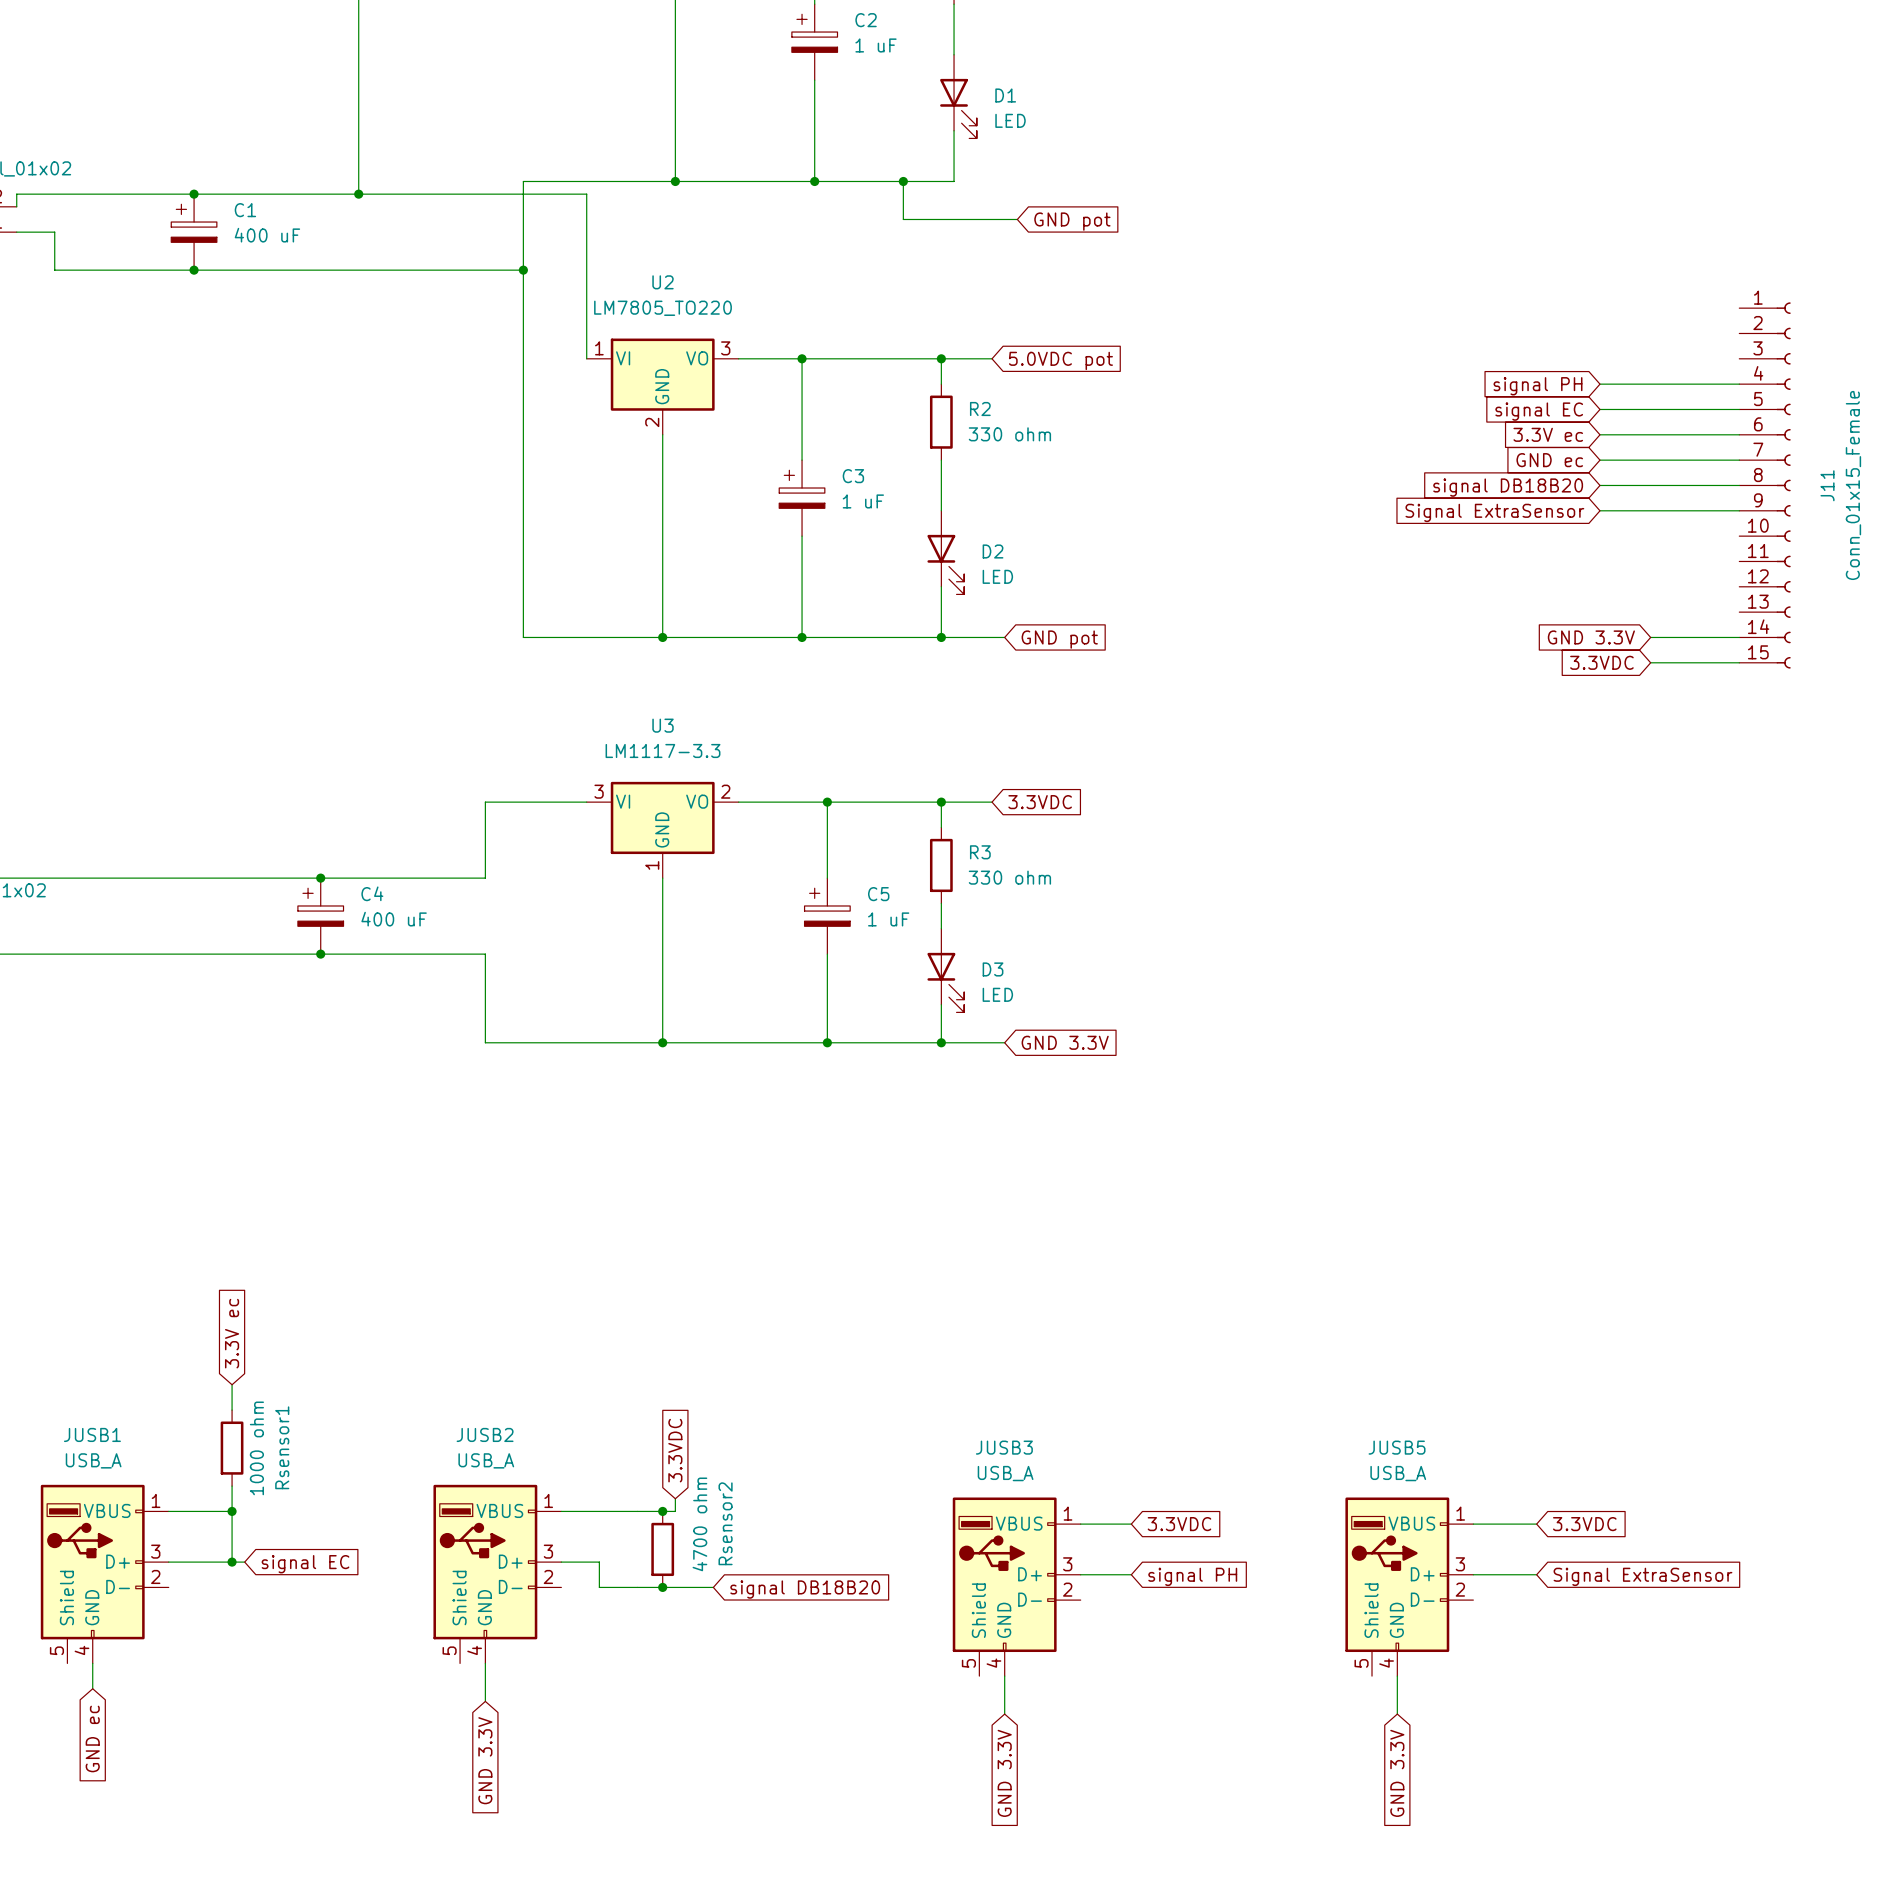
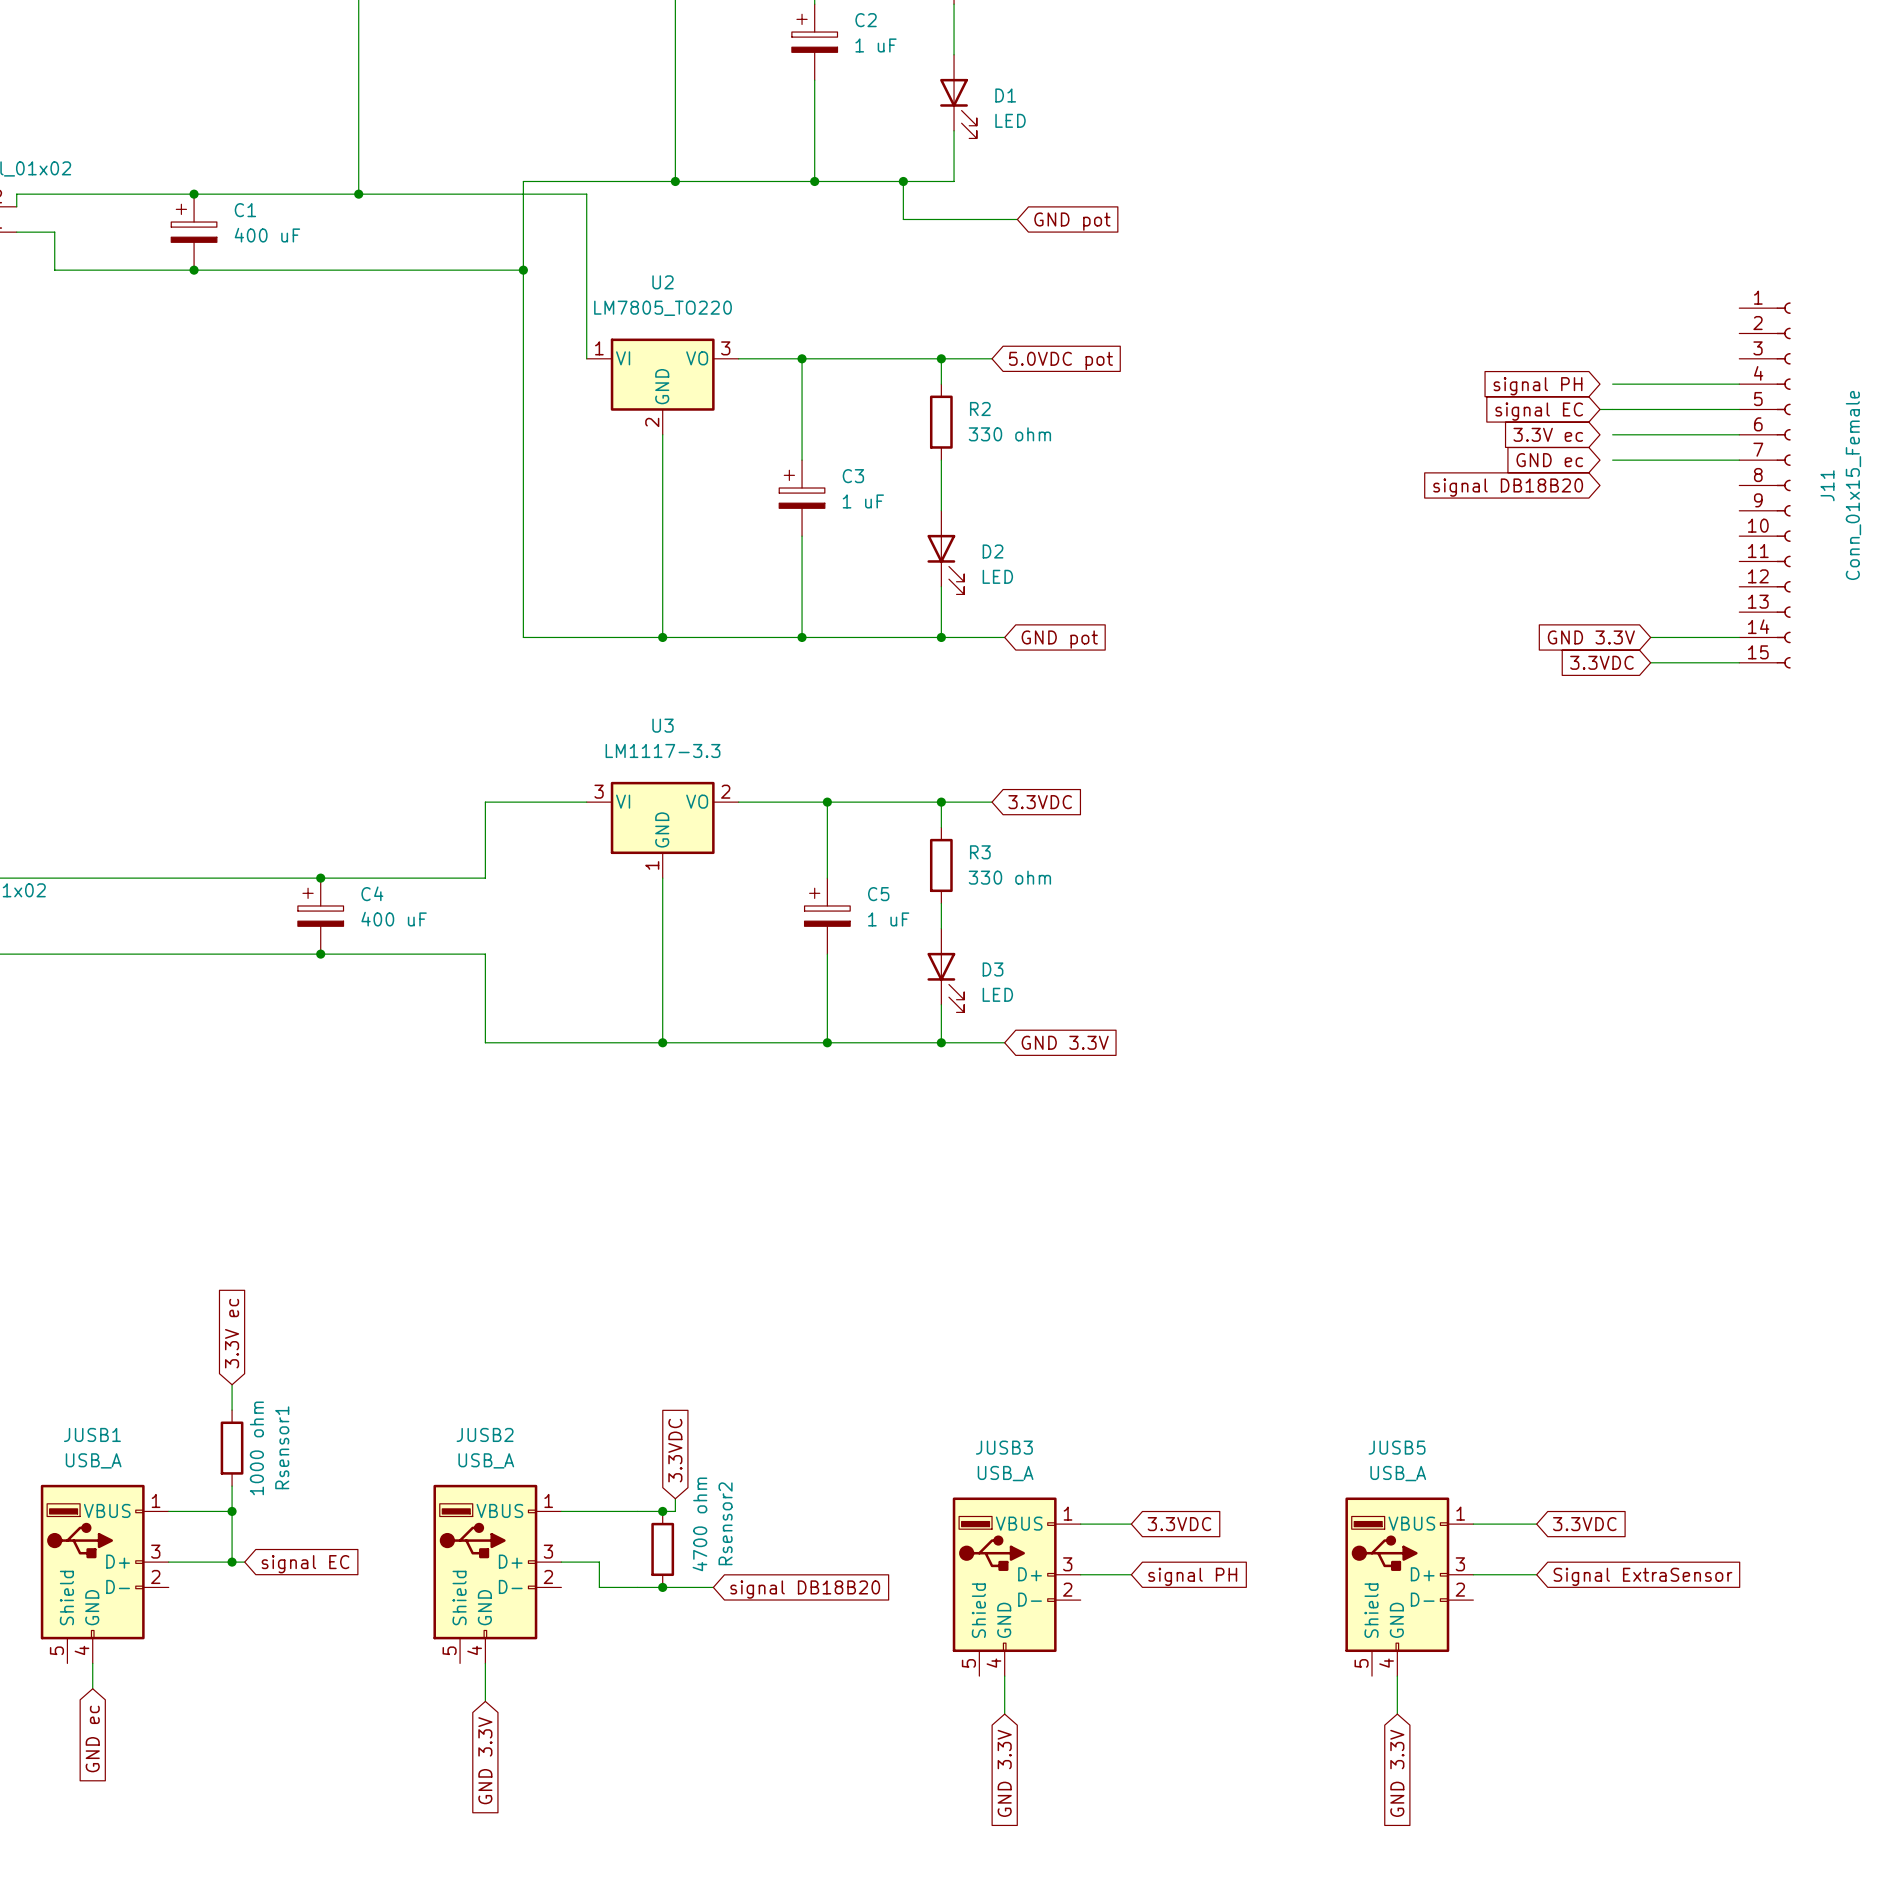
wire: (1599, 384) (1612, 384) -> none
wire: (1599, 434) (1612, 434) -> none
wire: (1599, 460) (1612, 460) -> none
wire: (1599, 485) (1739, 485) -> none
wire: (1599, 510) (1739, 510) -> none
global label: Signal ExtraSensor (1494, 512) -> none

